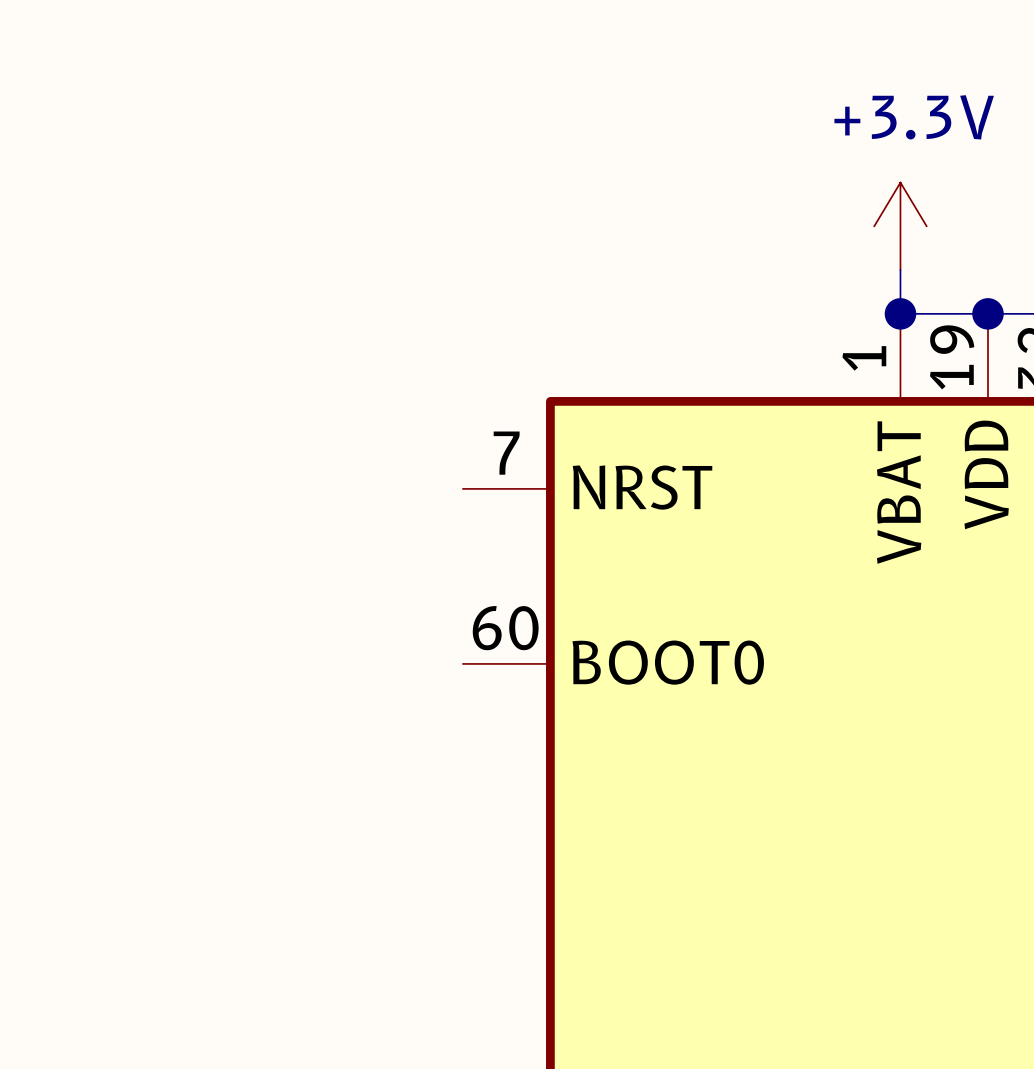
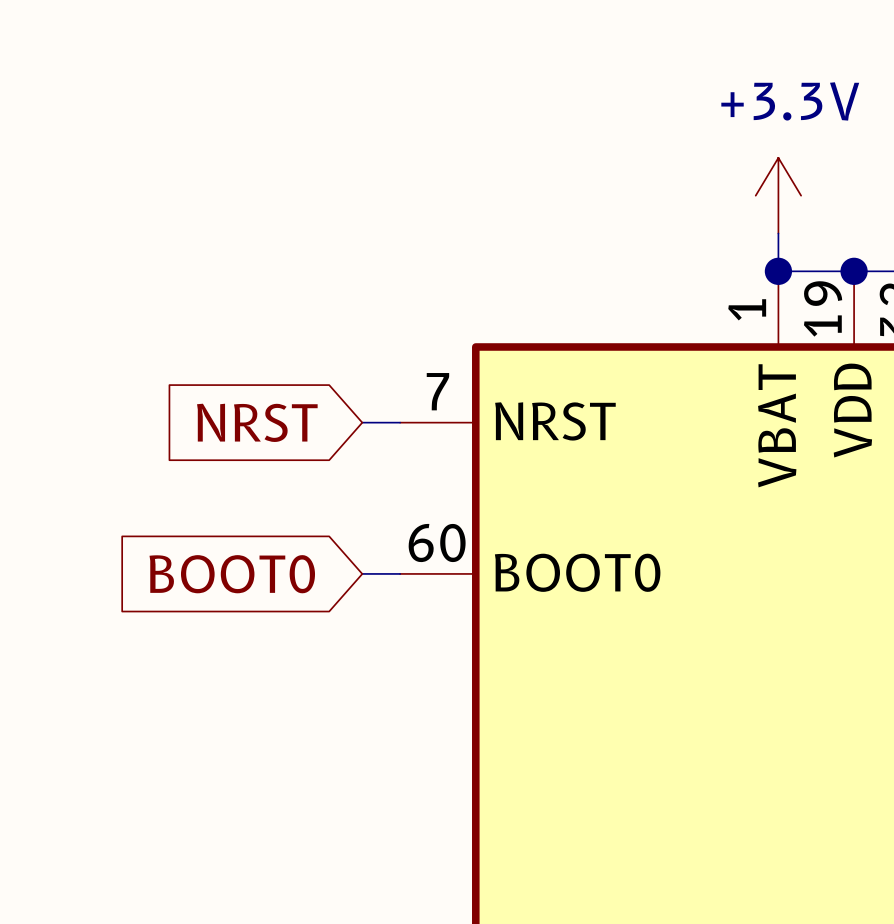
wire: none -> (362, 422) (400, 422)
global label: none -> NRST (257, 422)
wire: none -> (362, 573) (400, 573)
global label: none -> BOOT0 (232, 574)

